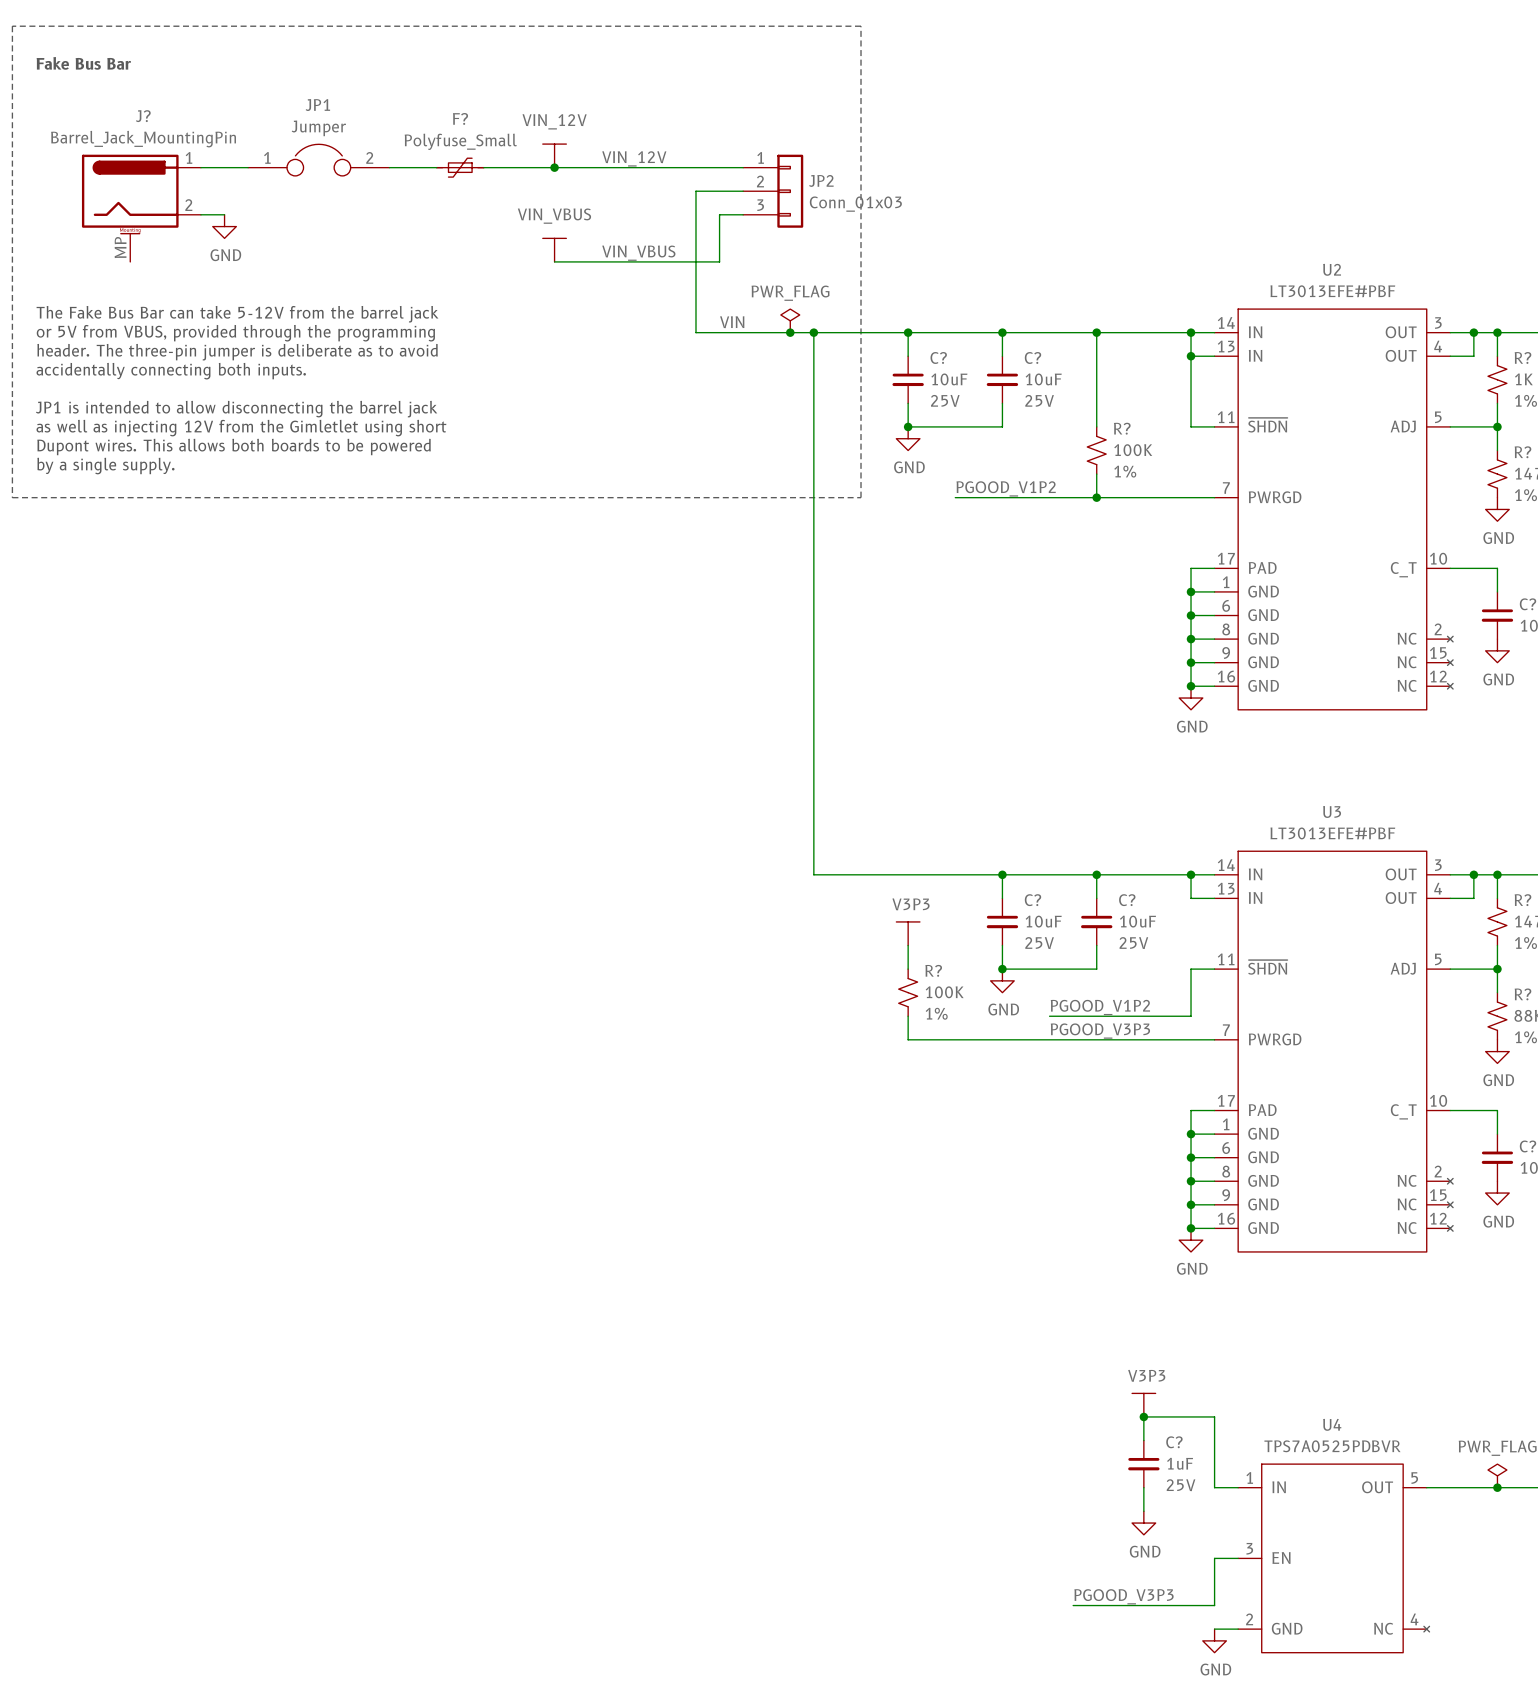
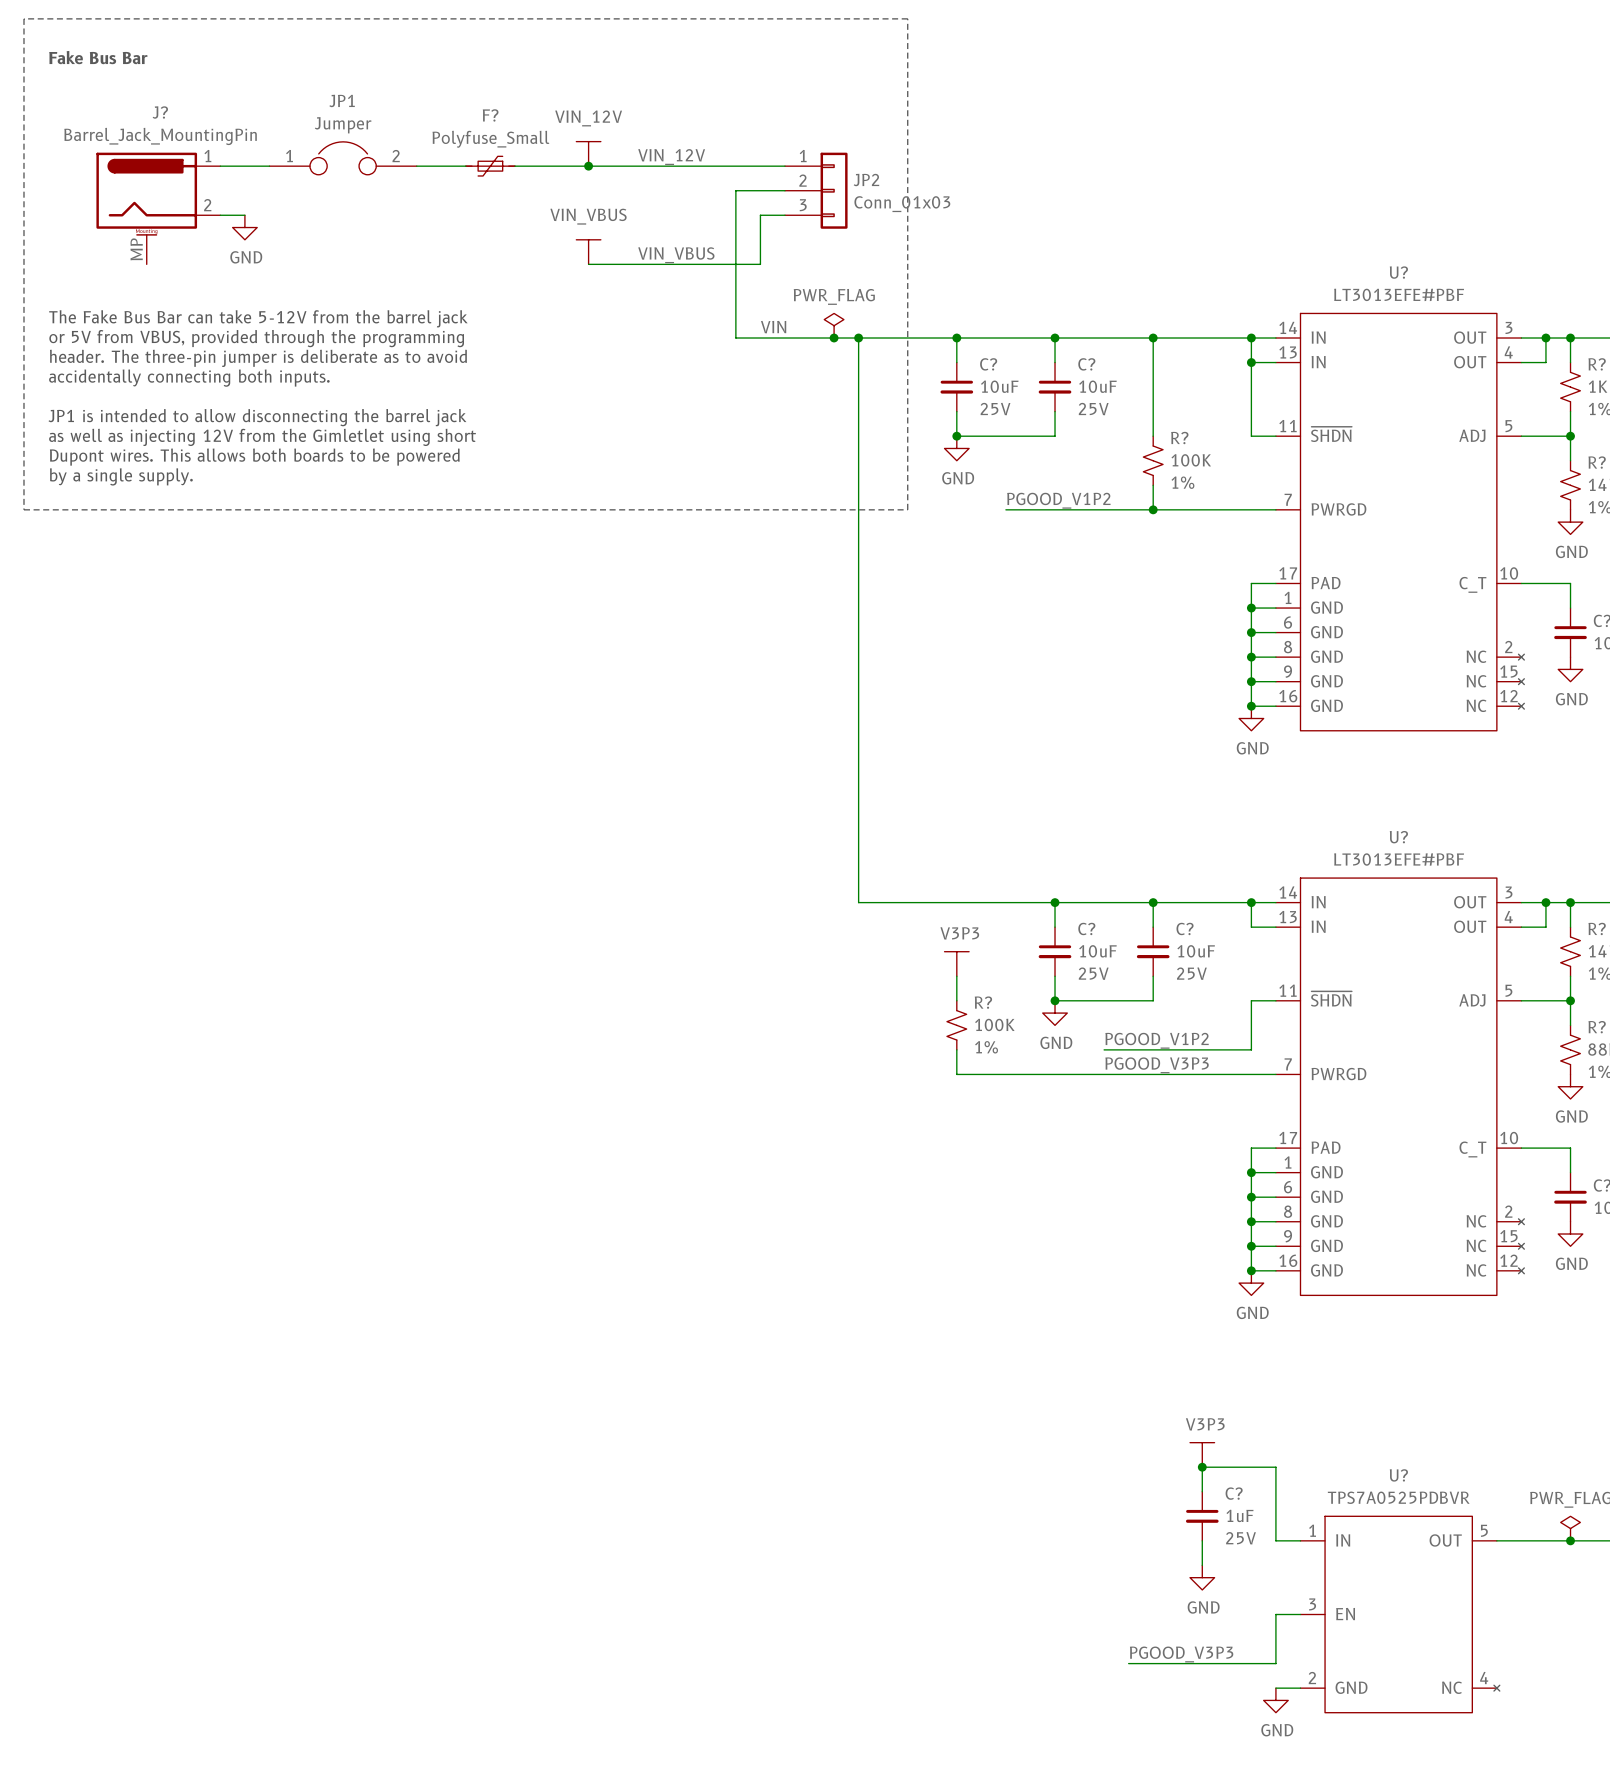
U2 name: U2 (1332, 269) -> U? (1398, 272)
U3 name: U3 (1332, 811) -> U? (1398, 837)
U4 name: U4 (1332, 1424) -> U? (1398, 1475)

